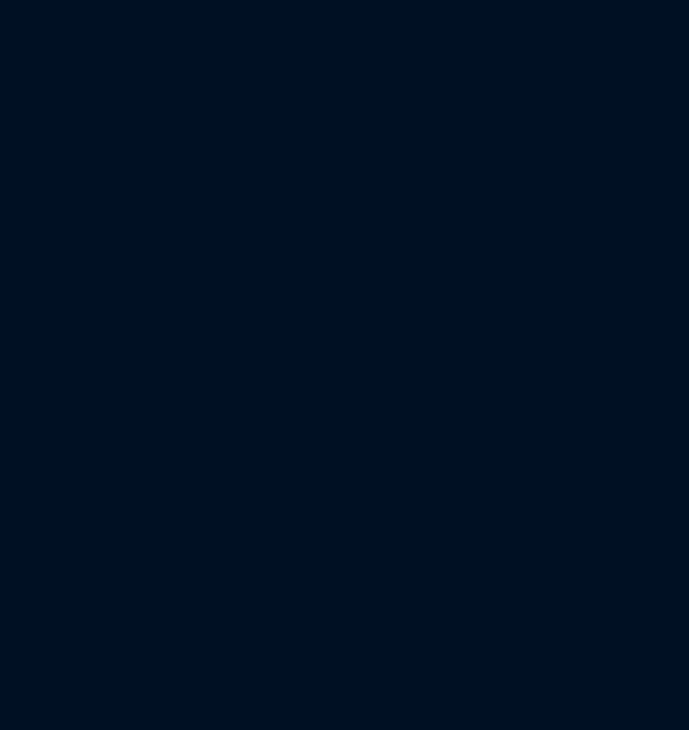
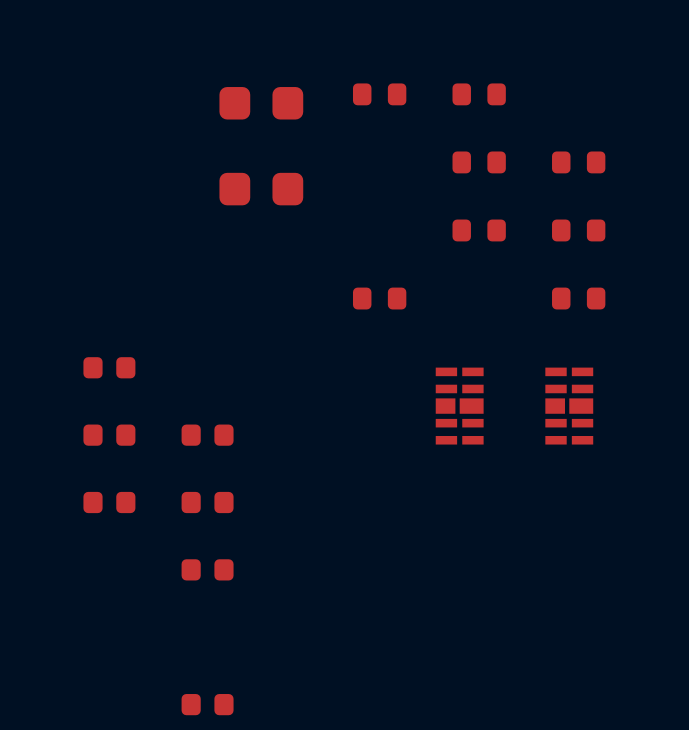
part: none -> (379, 94)
part: none -> (479, 94)
part: none -> (261, 103)
part: none -> (479, 162)
part: none -> (578, 162)
part: none -> (261, 189)
part: none -> (479, 230)
part: none -> (578, 230)
part: none -> (379, 298)
part: none -> (578, 298)
part: none -> (109, 367)
part: none -> (459, 406)
part: none -> (569, 406)
part: none -> (109, 435)
part: none -> (207, 435)
part: none -> (109, 502)
part: none -> (207, 502)
part: none -> (207, 569)
part: none -> (207, 704)

